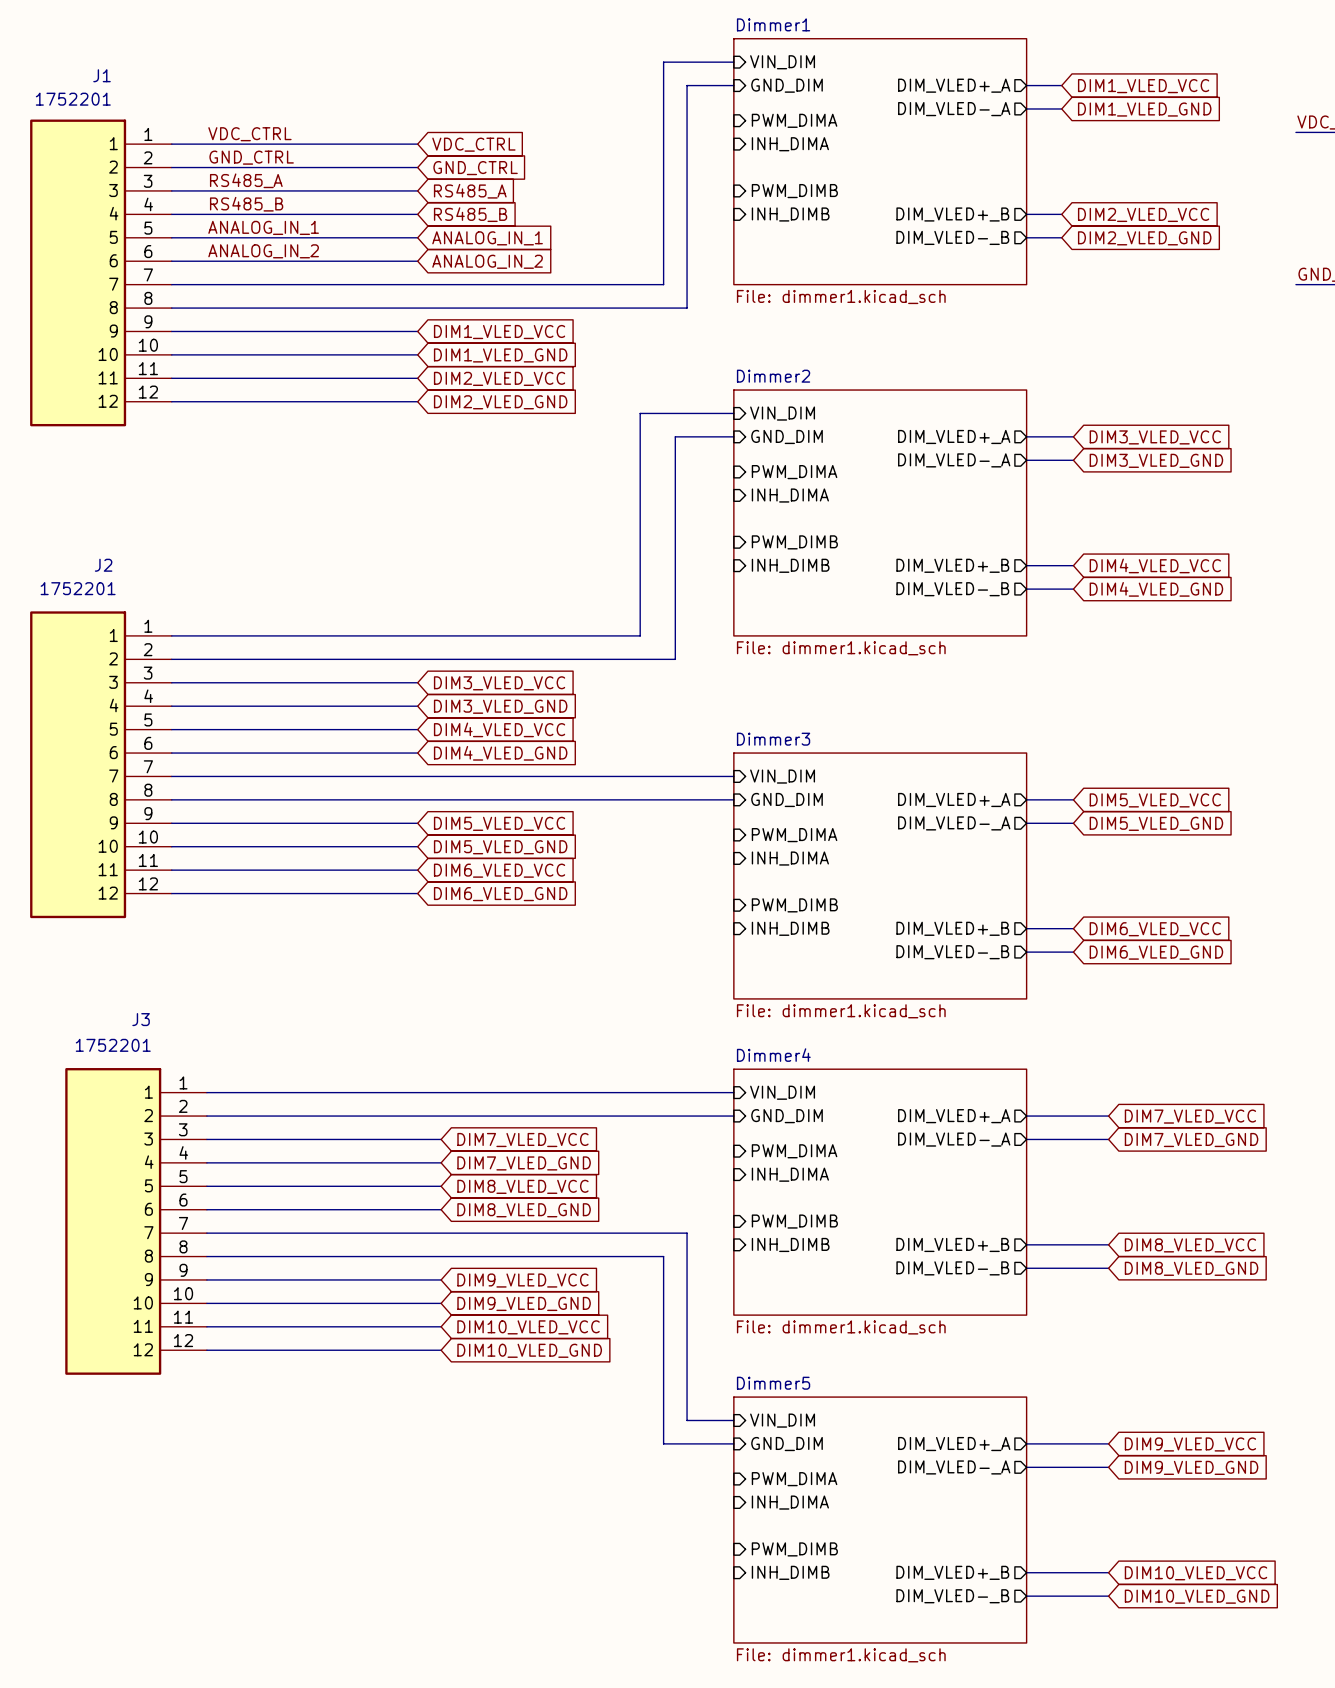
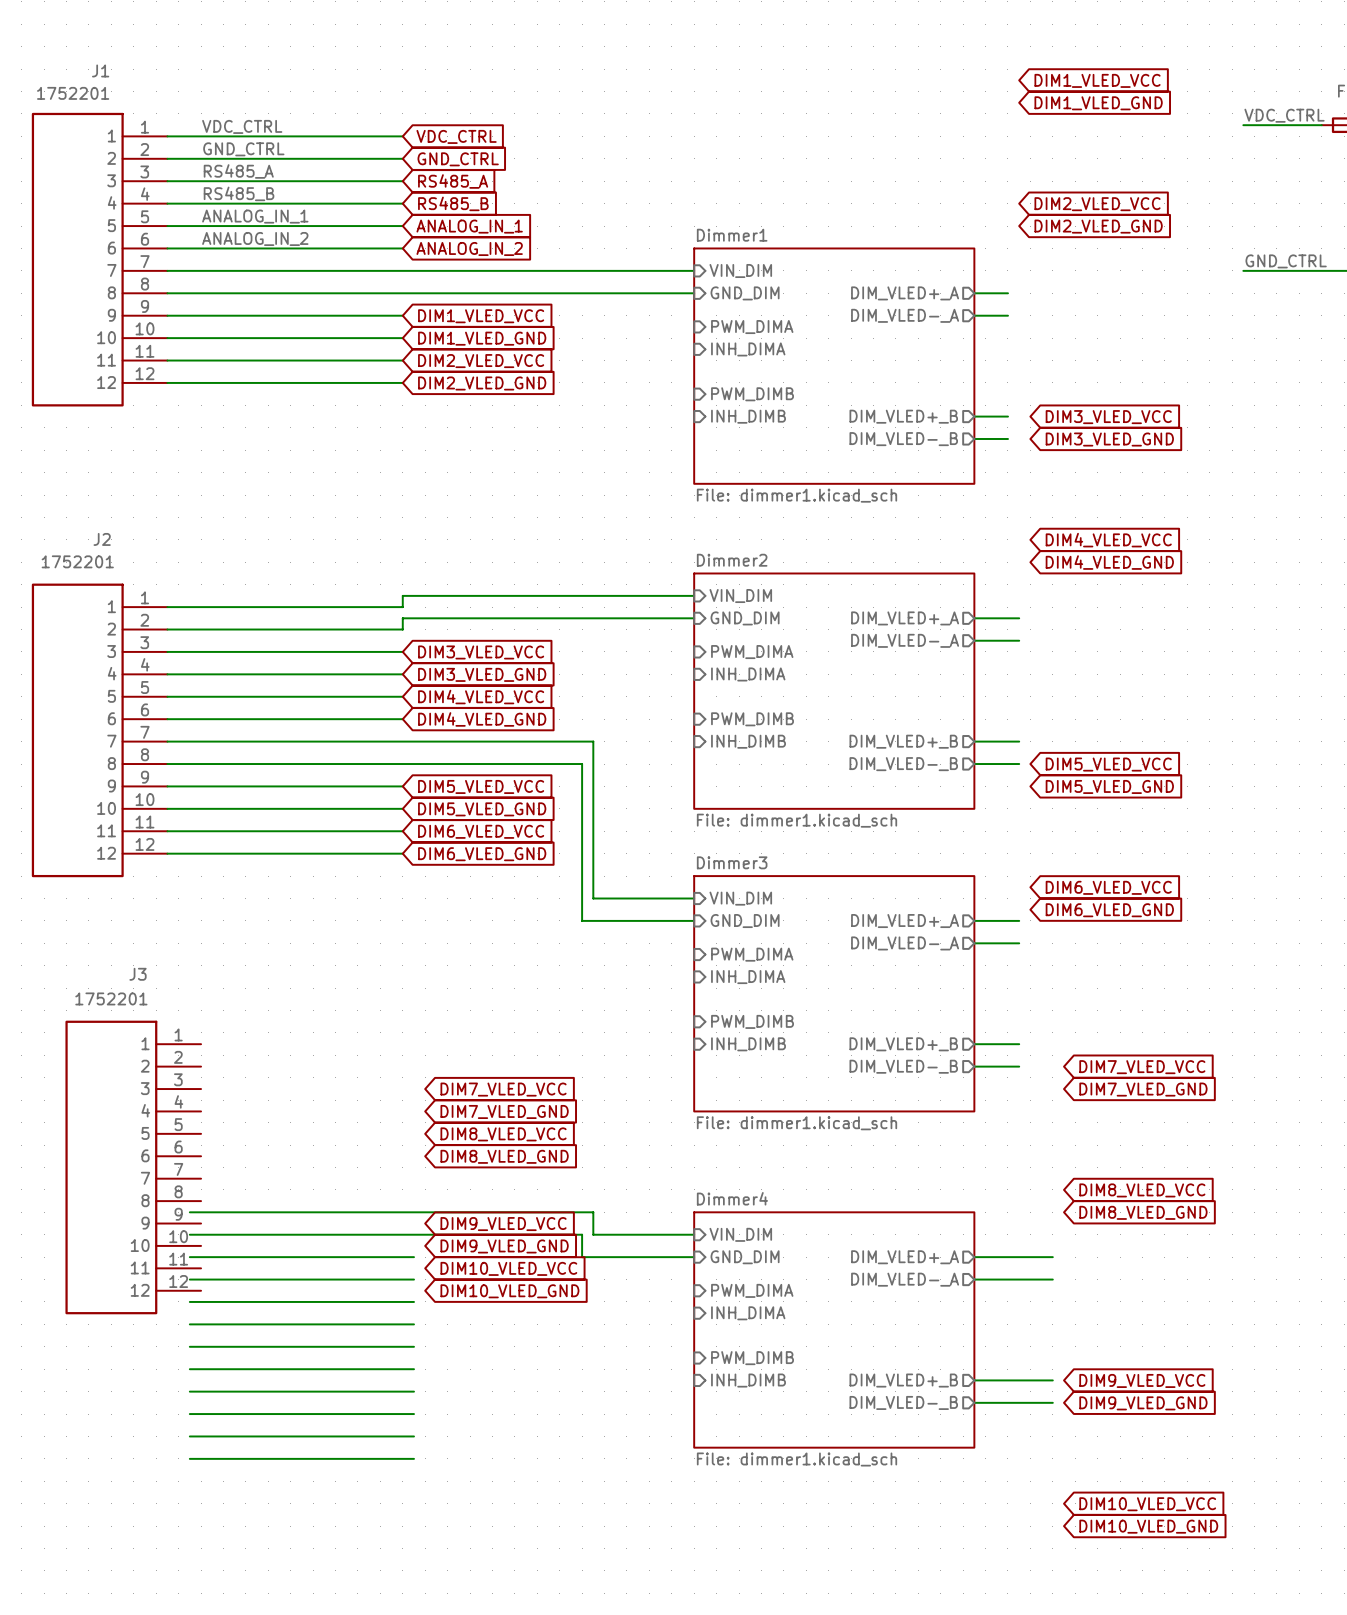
wire: (733, 62) (663, 62) (663, 284) -> (694, 270) (638, 270)
sheet pin: VIN_DIM (782, 62) -> none
wire: (733, 85) (687, 85) (687, 308) -> (694, 293) (660, 293)
sheet pin: GND_DIM (787, 85) -> none
sheet pin: DIM_VLED+_A (954, 85) -> none
wire: (1026, 85) (1061, 85) -> none
wire: (1026, 108) (1061, 108) -> (974, 293) (1007, 293)
sheet pin: DIM_VLED-_A (954, 109) -> none
sheet pin: PWM_DIMA (794, 120) -> none
sheet pin: INH_DIMA (790, 144) -> none
sheet Dimmer1 position: (880, 161) -> (834, 366)
sheet pin: PWM_DIMB (794, 191) -> none
sheet pin: INH_DIMB (790, 214) -> none
sheet pin: DIM_VLED+_B (952, 214) -> none
wire: (1026, 214) (1061, 214) -> none
sheet pin: DIM_VLED-_B (952, 237) -> none
wire: (1026, 237) (1061, 237) -> (974, 315) (1007, 315)
sheet pin: none -> VIN_DIM (740, 270)
sheet pin: none -> GND_DIM (745, 293)
sheet pin: none -> DIM_VLED+_A (905, 293)
sheet pin: none -> DIM_VLED-_A (905, 315)
sheet pin: none -> PWM_DIMA (752, 327)
sheet pin: none -> INH_DIMA (748, 349)
wire: (733, 413) (640, 413) (640, 635) (417, 635) -> (694, 595) (402, 595) (402, 607)
sheet pin: VIN_DIM (782, 413) -> none
sheet pin: none -> PWM_DIMB (752, 394)
wire: (733, 436) (675, 436) (675, 659) (417, 659) -> (694, 618) (402, 618) (402, 629)
sheet pin: GND_DIM (787, 436) -> INH_DIMB (748, 416)
sheet pin: DIM_VLED+_A (954, 436) -> DIM_VLED+_B (903, 416)
wire: none -> (974, 416) (985, 416)
wire: (1050, 436) (1073, 436) -> none
sheet pin: DIM_VLED-_A (954, 460) -> DIM_VLED-_B (903, 439)
wire: none -> (974, 438) (985, 438)
wire: (1050, 460) (1073, 460) -> none
sheet pin: PWM_DIMA (794, 472) -> none
sheet pin: INH_DIMA (790, 495) -> none
sheet Dimmer2 position: (880, 512) -> (834, 691)
sheet pin: PWM_DIMB (794, 542) -> none
sheet pin: INH_DIMB (790, 565) -> none
sheet pin: DIM_VLED+_B (952, 565) -> none
wire: (1026, 565) (1073, 565) -> (974, 640) (1019, 640)
sheet pin: DIM_VLED-_B (952, 589) -> none
wire: (1026, 589) (1073, 589) -> (974, 618) (1019, 618)
sheet pin: none -> VIN_DIM (740, 596)
sheet pin: none -> GND_DIM (745, 618)
sheet pin: none -> DIM_VLED+_A (905, 618)
sheet pin: none -> DIM_VLED-_A (905, 640)
sheet pin: none -> PWM_DIMA (752, 652)
sheet pin: none -> INH_DIMA (748, 674)
sheet pin: none -> PWM_DIMB (752, 719)
wire: (616, 776) (733, 776) -> (593, 741) (593, 898) (694, 898)
sheet pin: VIN_DIM (782, 776) -> INH_DIMB (748, 741)
sheet pin: none -> DIM_VLED+_B (903, 741)
wire: (605, 799) (733, 799) -> (582, 764) (582, 920) (694, 920)
sheet pin: GND_DIM (787, 799) -> none
sheet pin: DIM_VLED+_A (954, 799) -> DIM_VLED-_B (903, 764)
wire: (1061, 799) (1073, 799) -> (974, 764) (985, 764)
sheet pin: DIM_VLED-_A (954, 823) -> none
wire: (1026, 823) (1073, 823) -> (974, 741) (1019, 741)
sheet pin: PWM_DIMA (794, 835) -> none
sheet pin: INH_DIMA (790, 858) -> none
sheet Dimmer3 position: (880, 875) -> (834, 993)
sheet pin: PWM_DIMB (794, 905) -> none
sheet pin: INH_DIMB (790, 928) -> VIN_DIM (740, 898)
sheet pin: DIM_VLED+_B (952, 928) -> none
wire: (1026, 928) (1073, 928) -> (974, 920) (1019, 920)
sheet pin: DIM_VLED-_B (952, 952) -> DIM_VLED+_A (905, 921)
wire: (1026, 952) (1073, 952) -> (974, 943) (1019, 943)
sheet pin: none -> GND_DIM (745, 921)
sheet pin: none -> DIM_VLED-_A (905, 943)
sheet pin: none -> PWM_DIMA (752, 954)
sheet pin: none -> INH_DIMA (748, 977)
sheet pin: none -> PWM_DIMB (752, 1021)
wire: (206, 1092) (733, 1092) -> none
sheet pin: VIN_DIM (782, 1092) -> INH_DIMB (748, 1044)
sheet pin: none -> DIM_VLED+_B (903, 1044)
wire: (206, 1116) (733, 1116) -> none
sheet pin: GND_DIM (787, 1116) -> none
sheet pin: DIM_VLED+_A (954, 1116) -> DIM_VLED-_B (903, 1066)
wire: none -> (974, 1066) (985, 1066)
wire: (1061, 1116) (1108, 1116) -> (974, 1044) (1019, 1044)
wire: (206, 1139) (441, 1139) -> (189, 1257) (413, 1257)
sheet pin: DIM_VLED-_A (954, 1139) -> none
wire: (1026, 1139) (1108, 1139) -> (974, 1257) (1052, 1257)
sheet pin: PWM_DIMA (794, 1151) -> none
wire: (206, 1162) (441, 1162) -> (189, 1279) (413, 1279)
sheet pin: INH_DIMA (790, 1174) -> none
wire: (206, 1186) (441, 1186) -> (189, 1301) (413, 1301)
sheet Dimmer4 position: (880, 1192) -> (834, 1329)
wire: (206, 1209) (441, 1209) -> (189, 1324) (413, 1324)
sheet pin: PWM_DIMB (794, 1221) -> none
wire: (206, 1233) (687, 1233) (687, 1420) (733, 1420) -> none
sheet pin: INH_DIMB (790, 1244) -> none
sheet pin: DIM_VLED+_B (952, 1244) -> none
wire: (1026, 1244) (1108, 1244) -> none
wire: (206, 1256) (663, 1256) (663, 1443) (733, 1443) -> none
wire: none -> (189, 1212) (593, 1212) (593, 1234) (694, 1234)
sheet pin: DIM_VLED-_B (952, 1268) -> none
wire: (1026, 1268) (1108, 1268) -> (974, 1279) (1052, 1279)
wire: (206, 1279) (441, 1279) -> (189, 1391) (413, 1391)
wire: none -> (189, 1234) (582, 1234) (582, 1257) (694, 1257)
sheet pin: none -> VIN_DIM (740, 1234)
wire: (206, 1303) (441, 1303) -> (189, 1414) (413, 1414)
sheet pin: none -> GND_DIM (745, 1257)
sheet pin: none -> DIM_VLED+_A (905, 1257)
wire: (206, 1326) (441, 1326) -> (189, 1436) (413, 1436)
sheet pin: none -> DIM_VLED-_A (905, 1279)
wire: (206, 1350) (441, 1350) -> (189, 1458) (413, 1458)
sheet pin: none -> PWM_DIMA (752, 1290)
sheet pin: none -> INH_DIMA (748, 1313)
wire: none -> (189, 1346) (413, 1346)
sheet pin: VIN_DIM (782, 1420) -> none
sheet pin: none -> PWM_DIMB (752, 1358)
wire: none -> (189, 1369) (413, 1369)
wire: (1096, 1443) (1108, 1443) -> (974, 1380) (985, 1380)
sheet pin: GND_DIM (787, 1444) -> INH_DIMB (748, 1380)
sheet pin: DIM_VLED+_A (954, 1444) -> DIM_VLED+_B (903, 1380)
sheet pin: DIM_VLED-_A (954, 1467) -> DIM_VLED-_B (903, 1402)
wire: (1096, 1467) (1108, 1467) -> (974, 1402) (985, 1402)
sheet pin: PWM_DIMA (794, 1479) -> none
sheet pin: INH_DIMA (790, 1502) -> none
sheet Dimmer5: File: dimmer1.kicad_sch (880, 1520) -> none
sheet pin: PWM_DIMB (794, 1549) -> none
sheet pin: INH_DIMB (790, 1572) -> none
sheet pin: DIM_VLED+_B (952, 1572) -> none
wire: (1026, 1572) (1108, 1572) -> none
sheet pin: DIM_VLED-_B (952, 1596) -> none
wire: (1026, 1596) (1108, 1596) -> none

